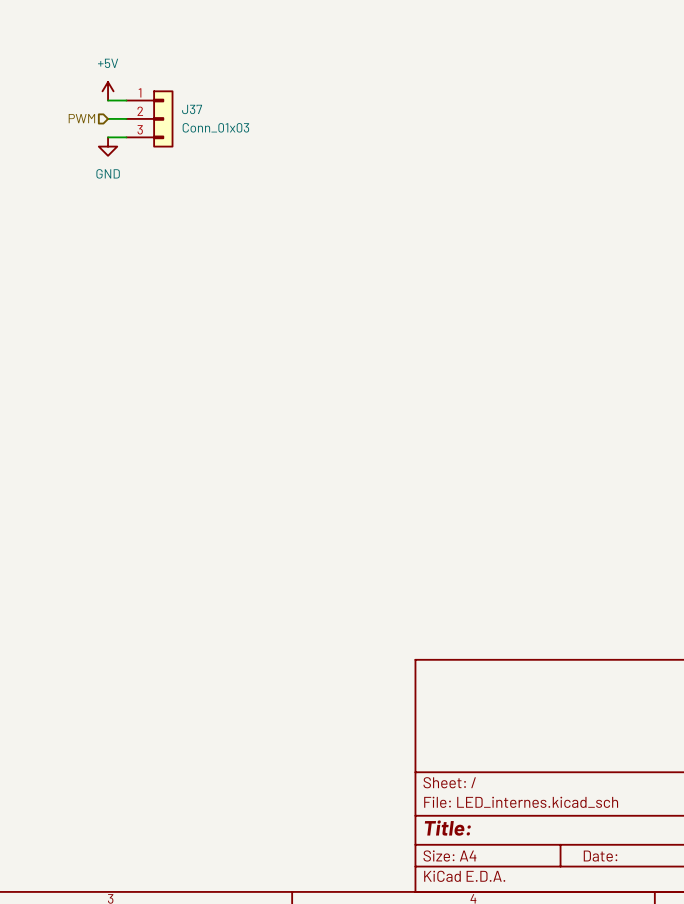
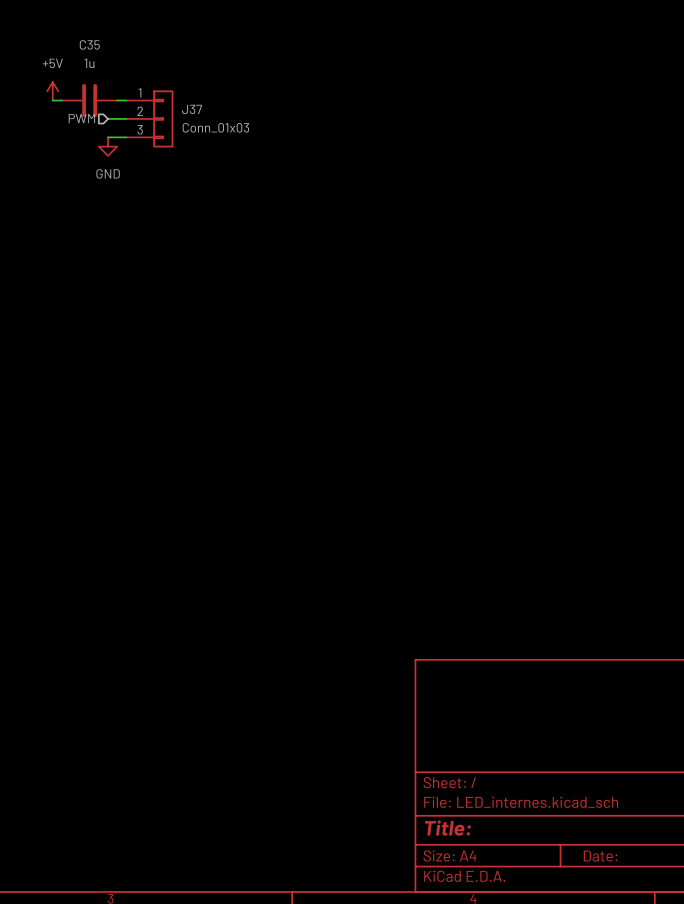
power symbol position: +5V (108, 91) -> +5V (52, 91)
C35: none -> 1u (89, 100)

